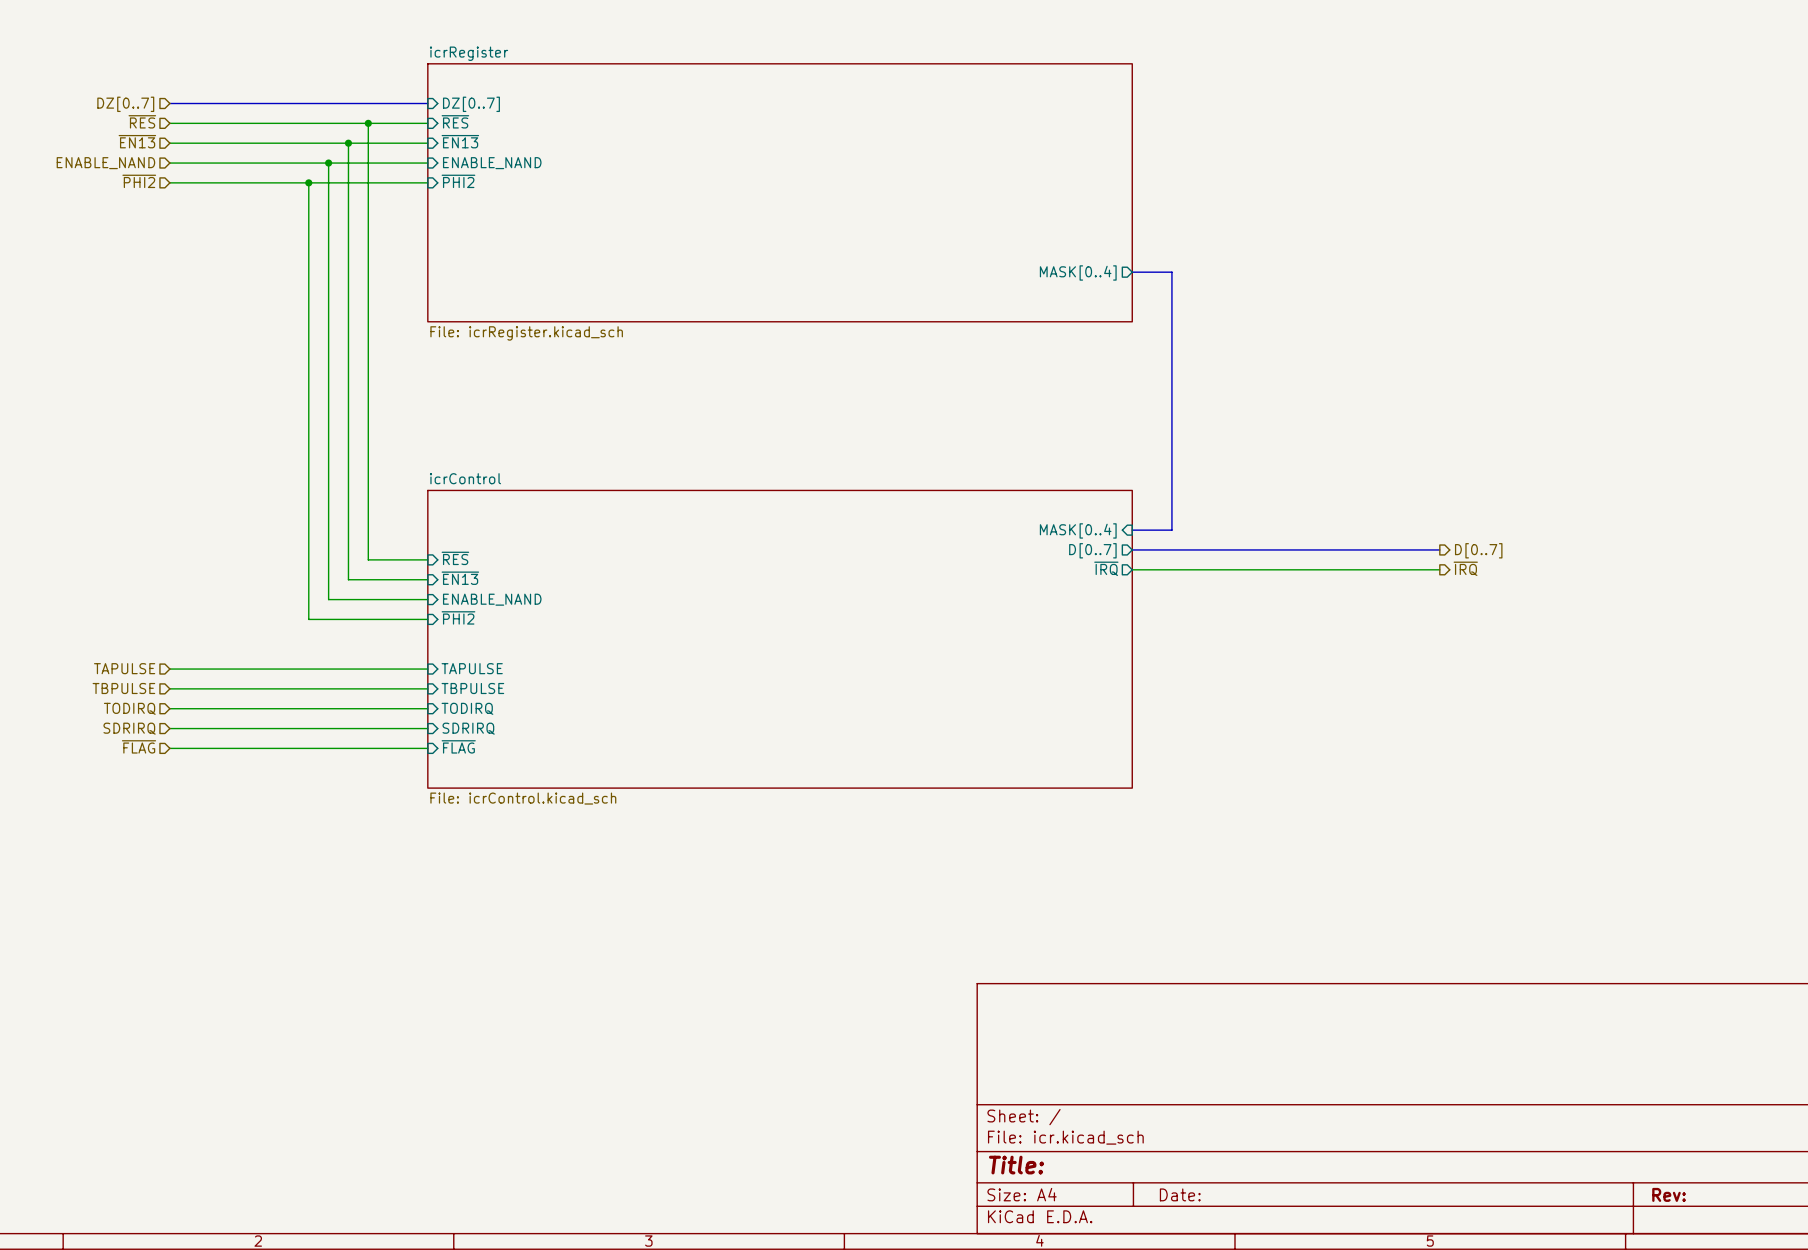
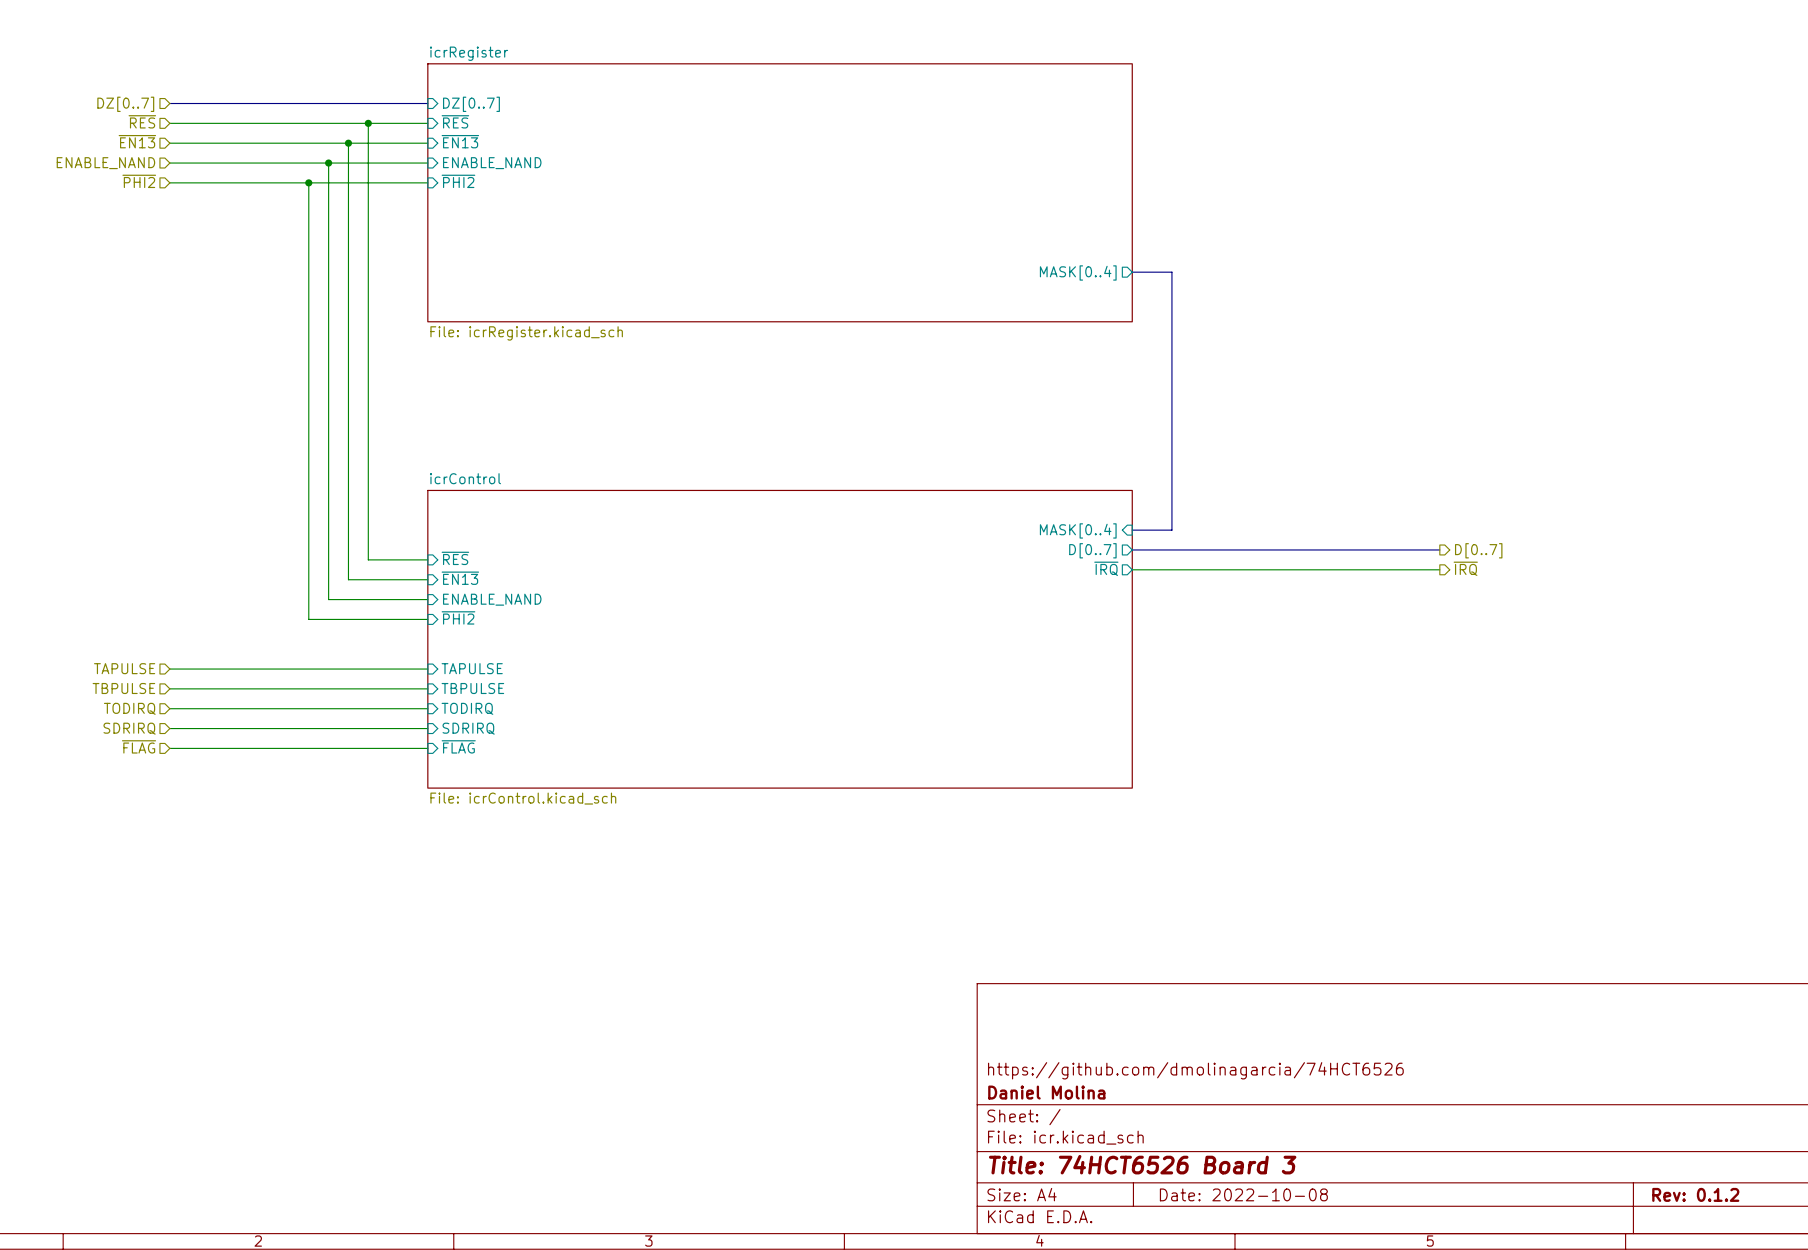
title block: none -> https://github.com/dmolinagarcia/74HCT6526 (1195, 1070)
title block: none -> Daniel Molina (1046, 1092)
title block: Title: (1016, 1165) -> Title: 74HCT6526 Board 3 (1142, 1164)
title block: Date: (1180, 1194) -> Date: 2022-10-08 (1243, 1194)
title block: Rev: (1669, 1194) -> Rev: 0.1.2 (1695, 1194)

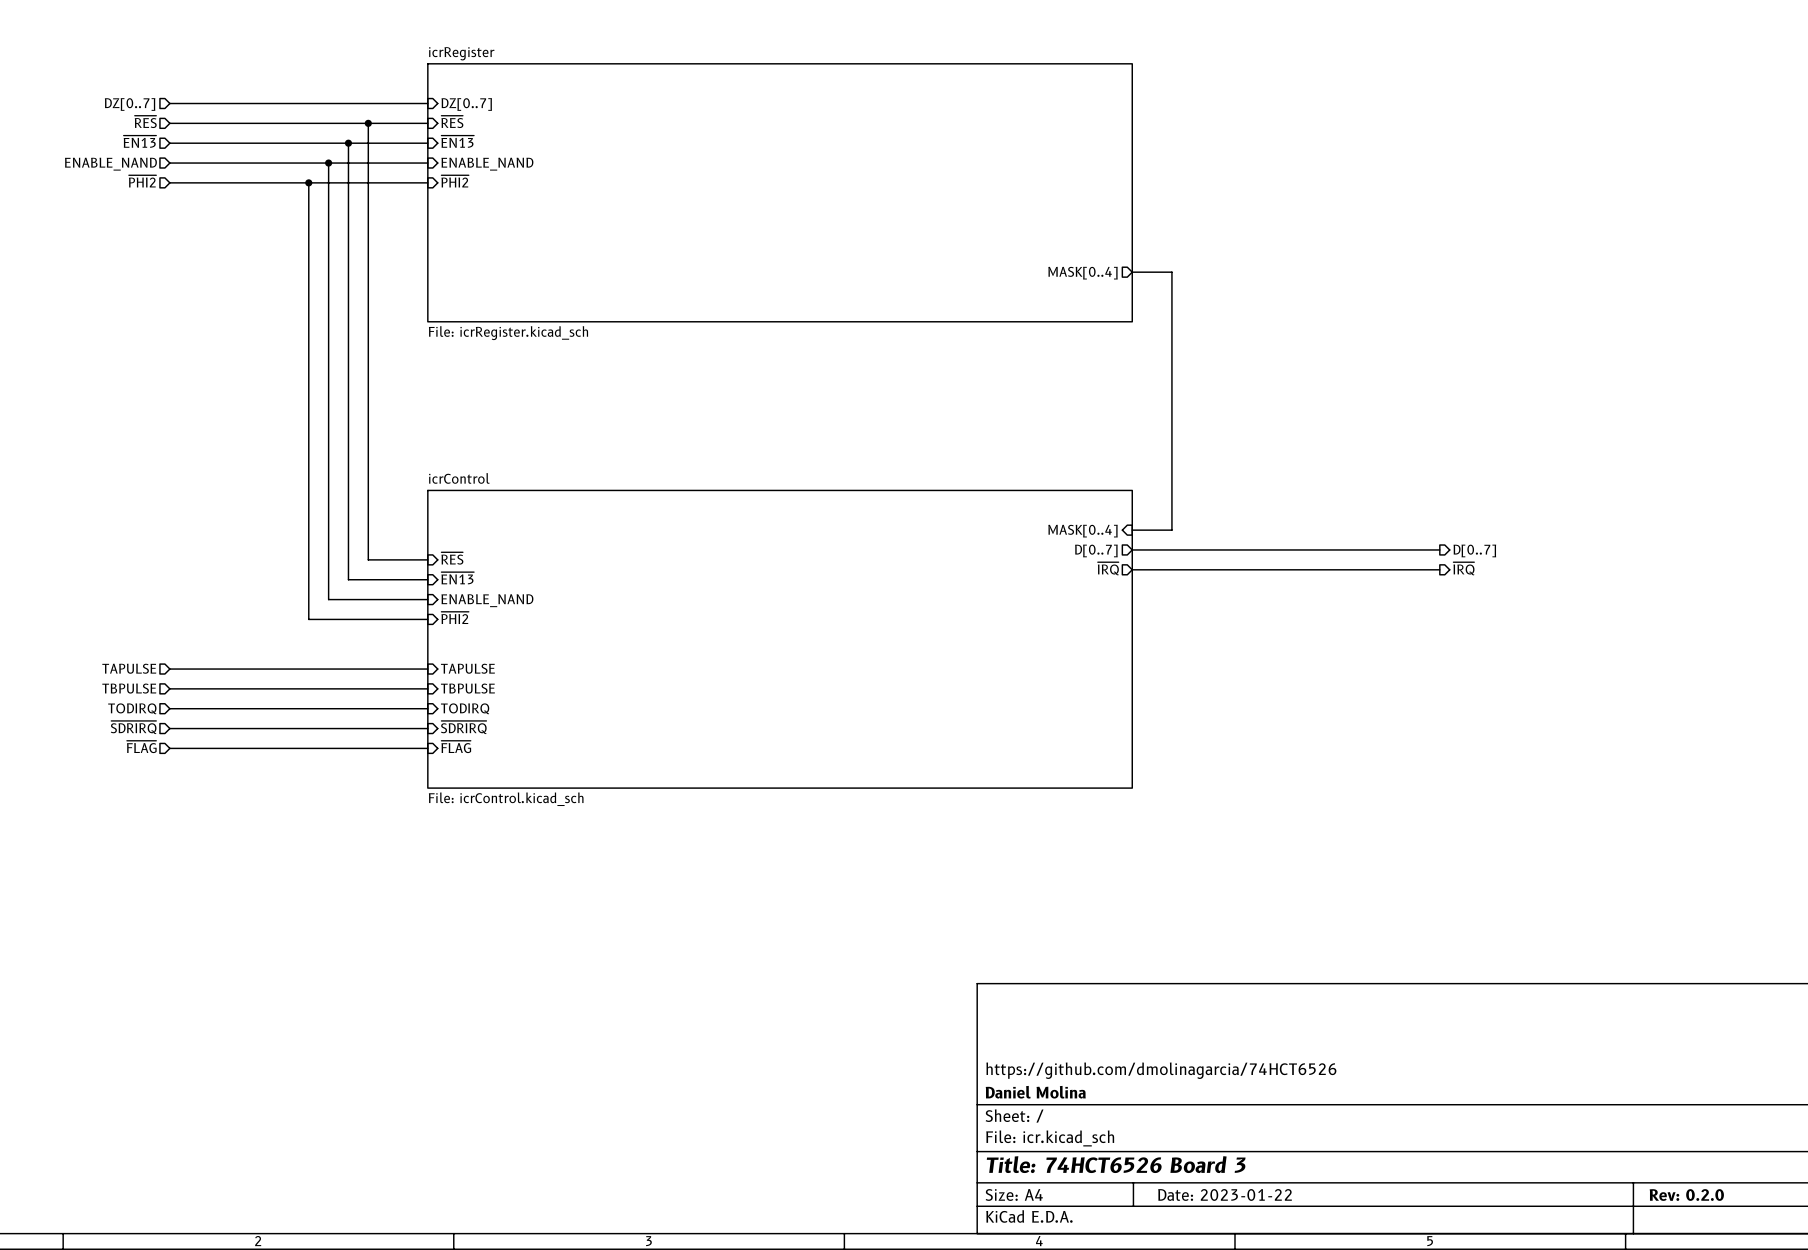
hierarchical label: SDRIRQ (129, 728) -> ~{SDRIRQ} (133, 727)
sheet pin: SDRIRQ (468, 728) -> ~{SDRIRQ} (463, 727)
title block: Date: 2022-10-08 (1243, 1194) -> Date: 2023-01-22 (1225, 1194)
title block: Rev: 0.1.2 (1695, 1194) -> Rev: 0.2.0 (1686, 1195)

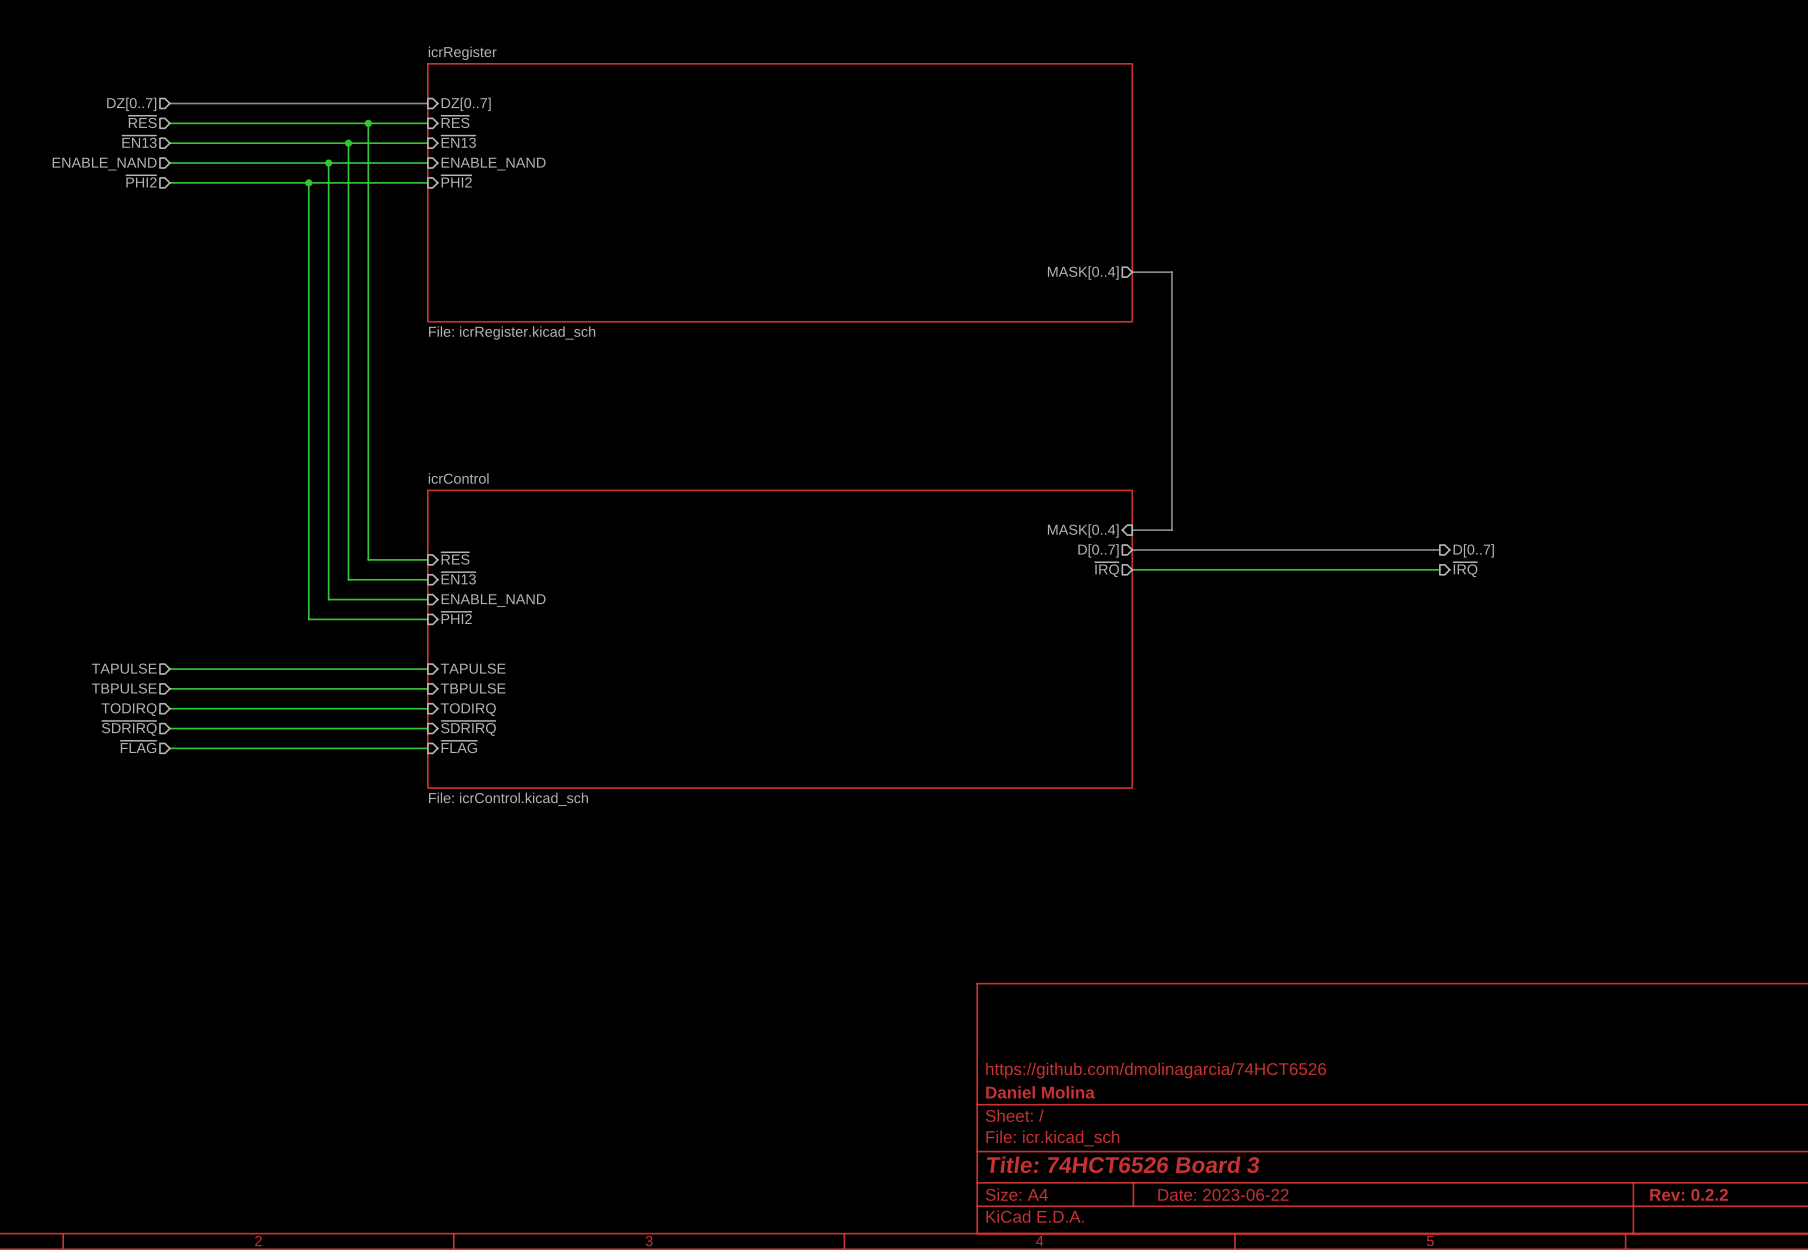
title block: Date: 2023-01-22 (1225, 1194) -> Date: 2023-06-22 (1223, 1194)
title block: Rev: 0.2.0 (1686, 1195) -> Rev: 0.2.2 (1689, 1194)

